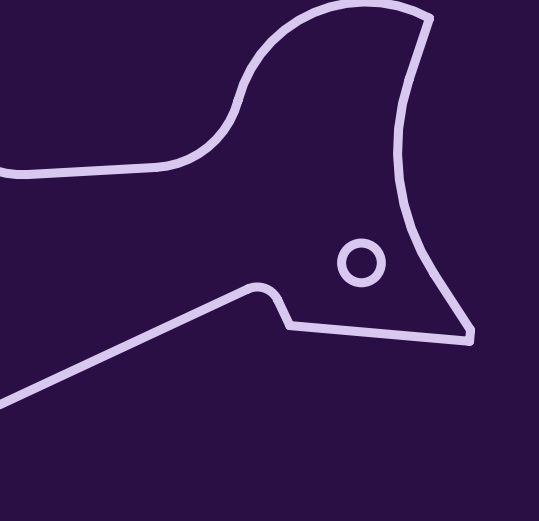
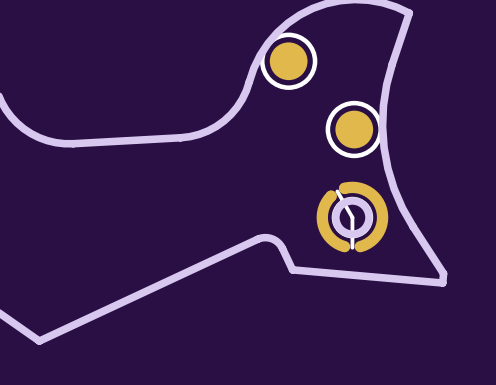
part: none -> (288, 61)
part: none -> (354, 129)
part: none -> (352, 217)

